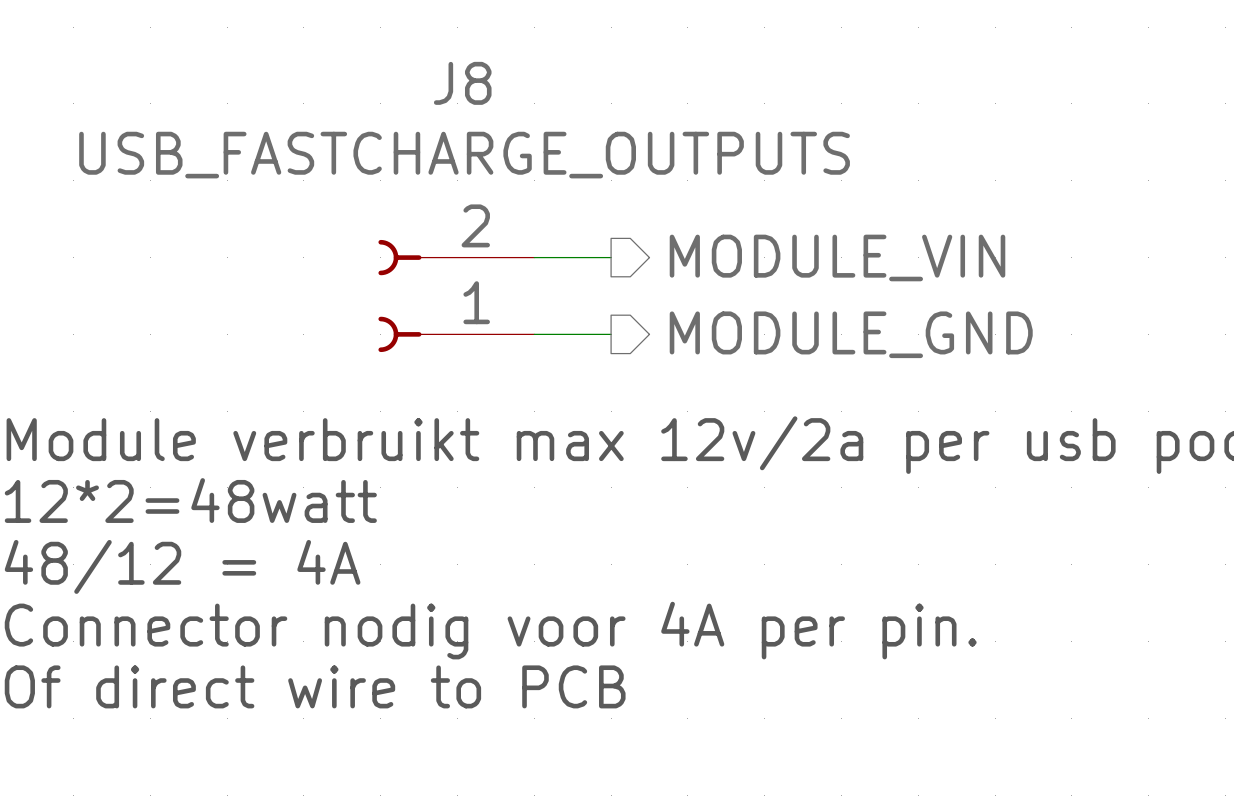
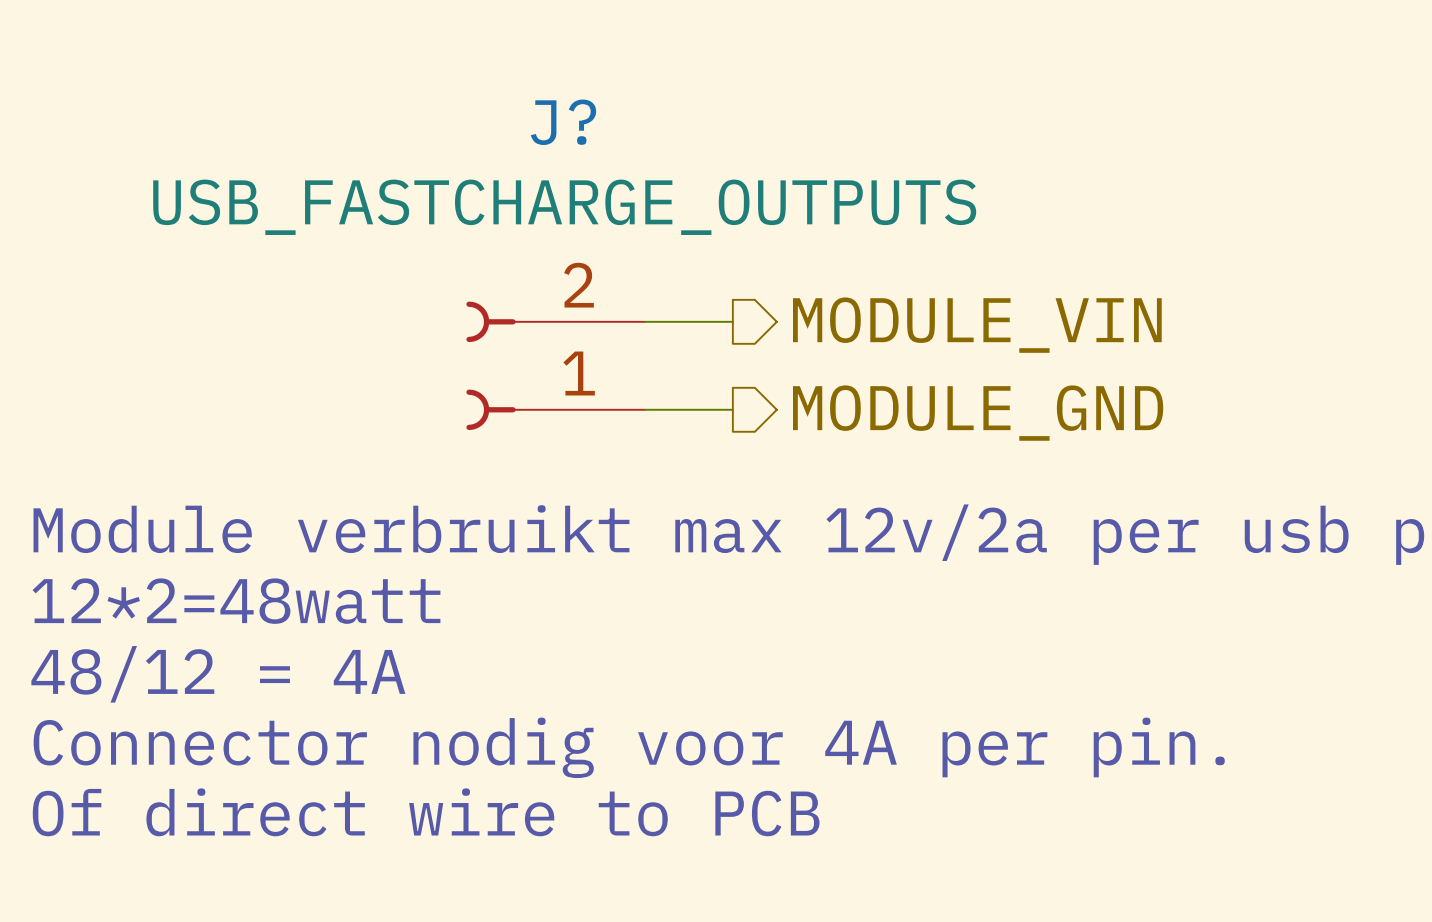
J8 name: J8 (462, 83) -> J? (563, 122)

